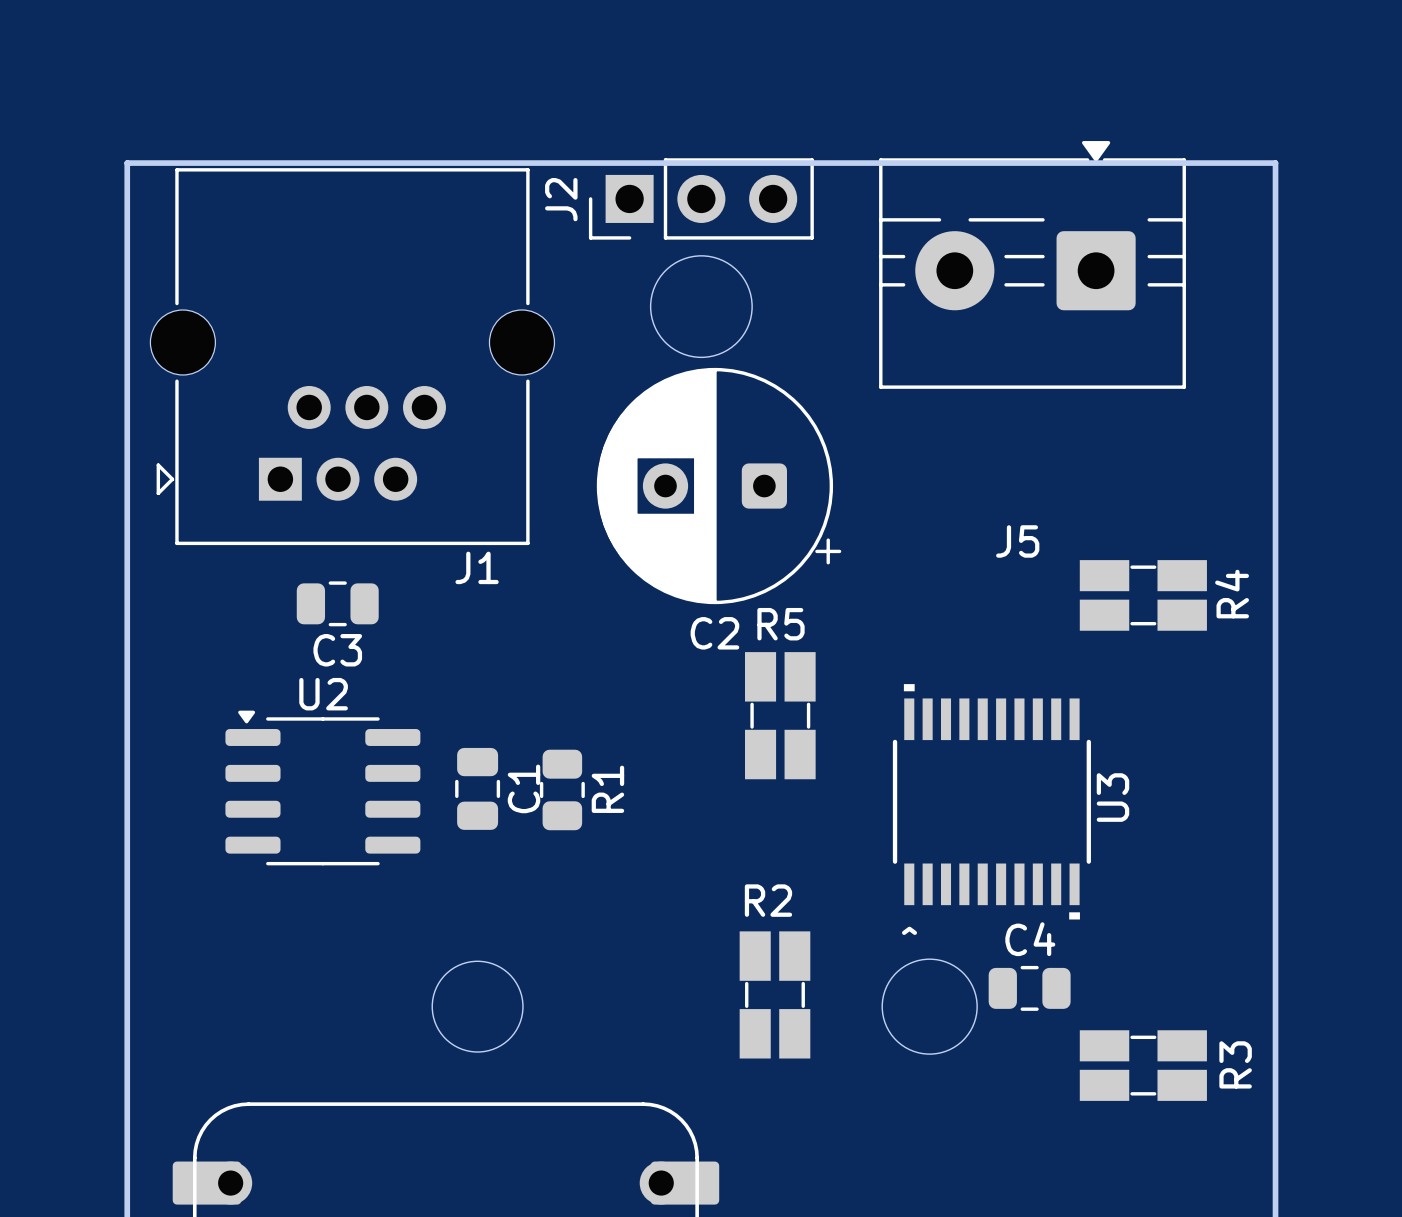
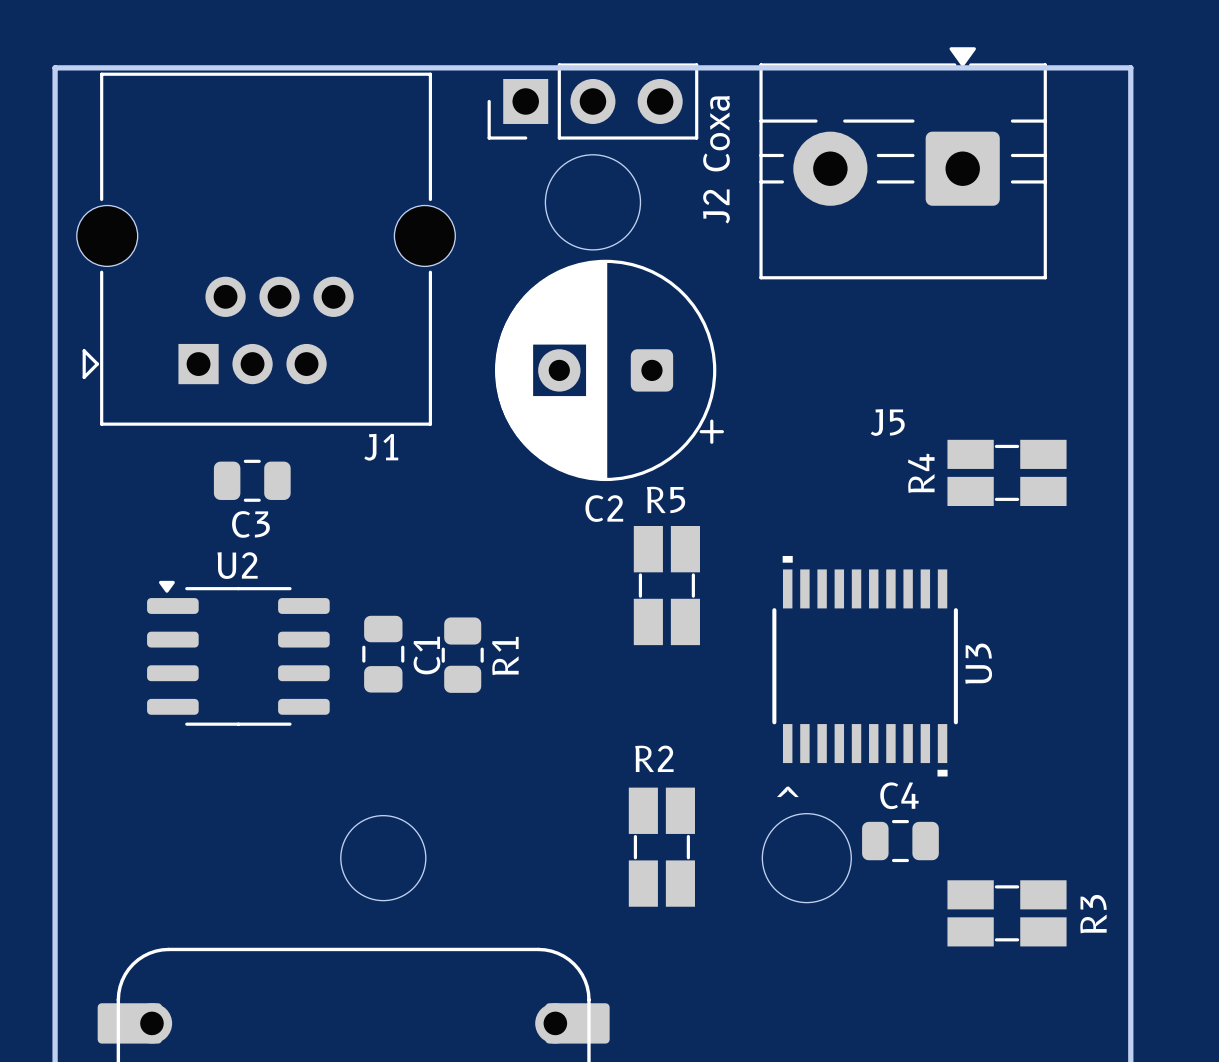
J2 name: J2 (561, 199) -> J2 Coxa (716, 159)
R4 name position: R4 (1232, 594) -> R4 (921, 473)

